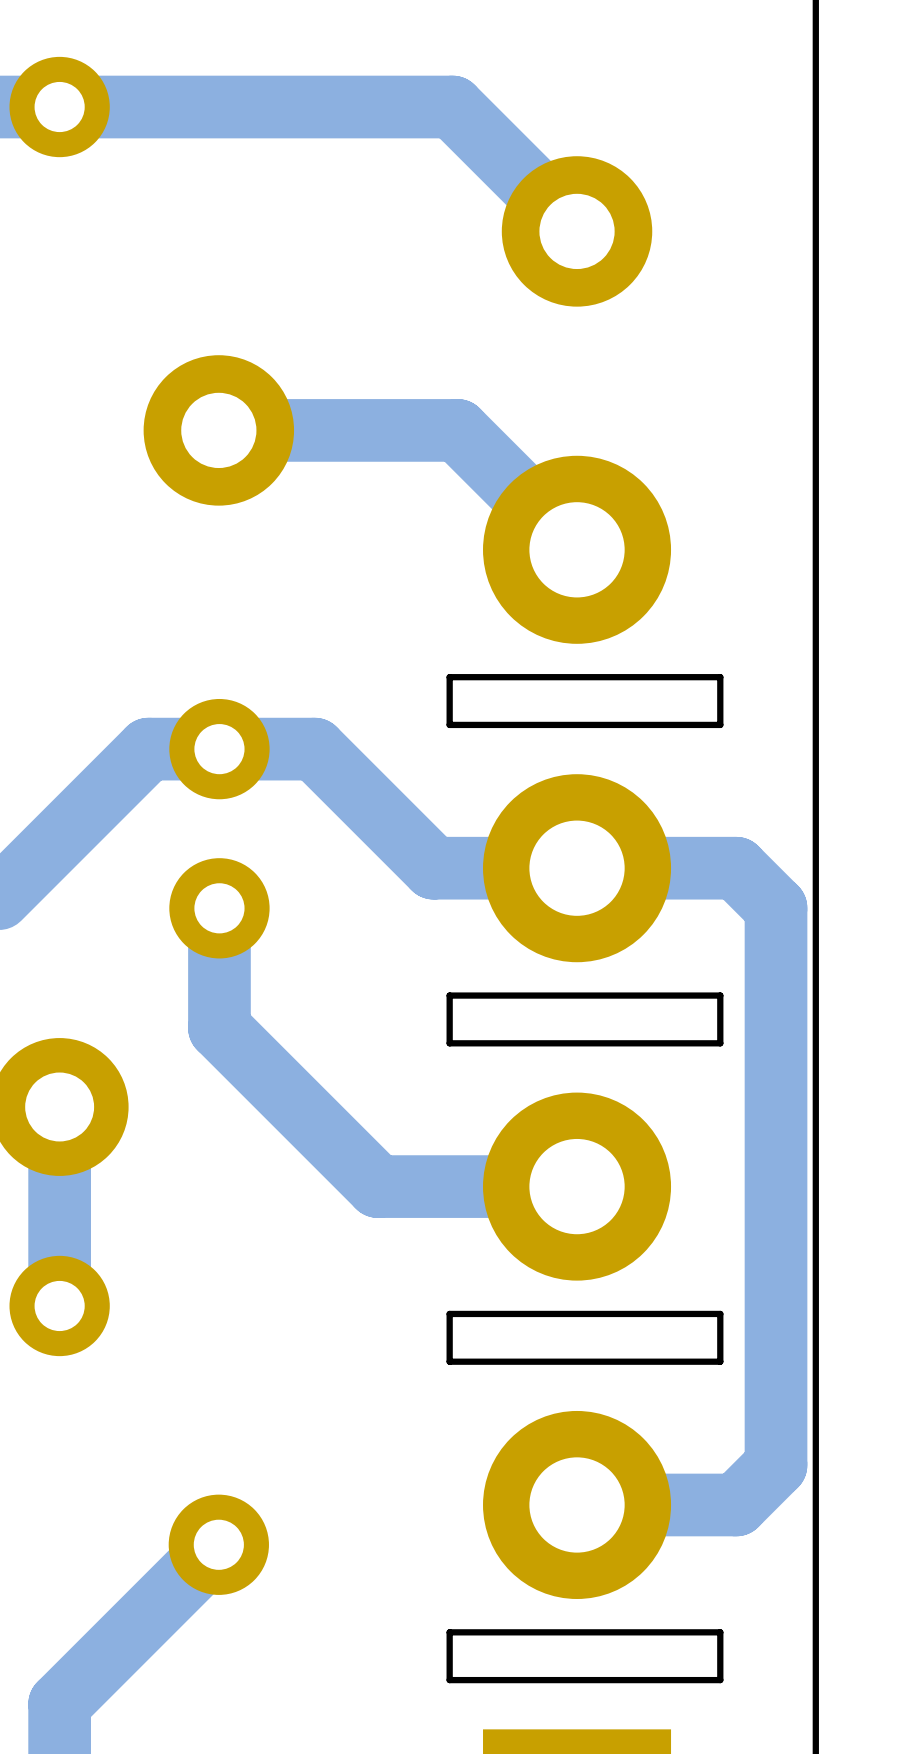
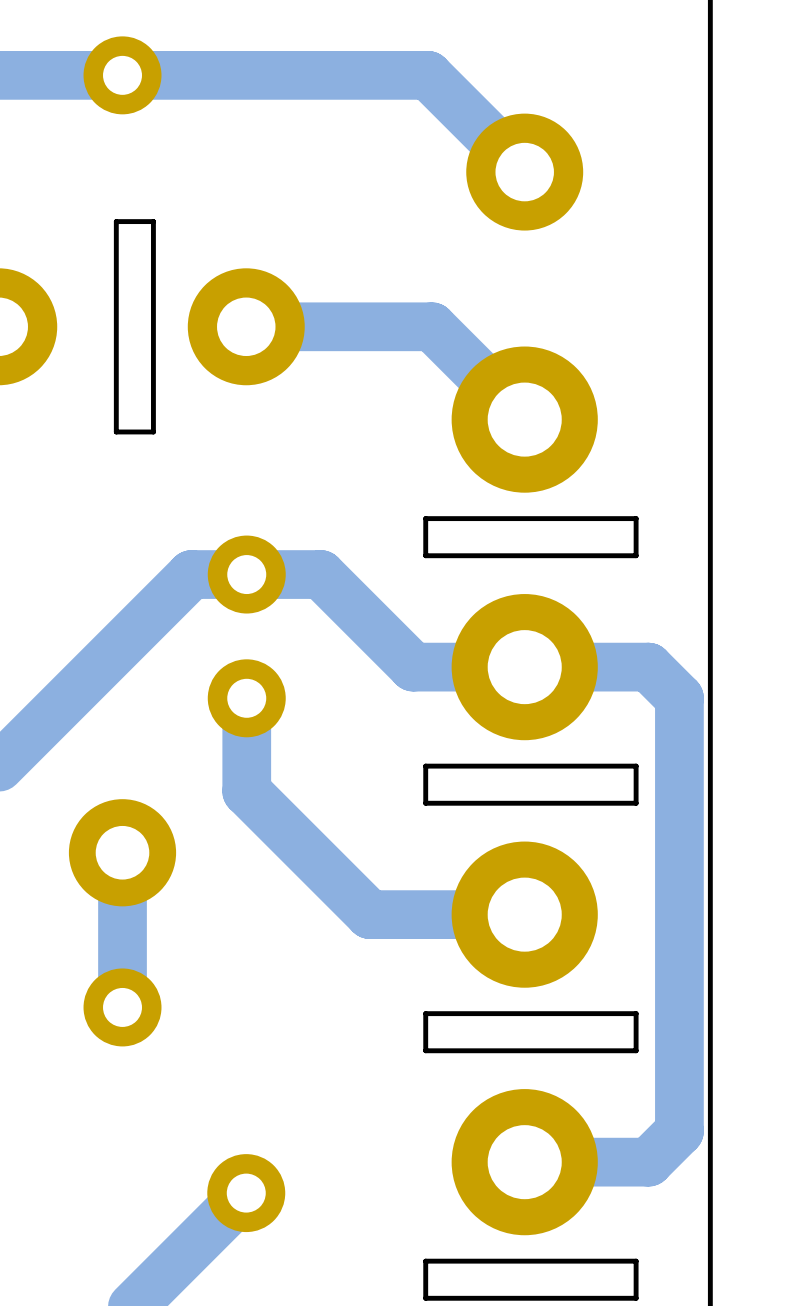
board edge: none -> (153, 221) (116, 221) (116, 431) (153, 431) (153, 221)

